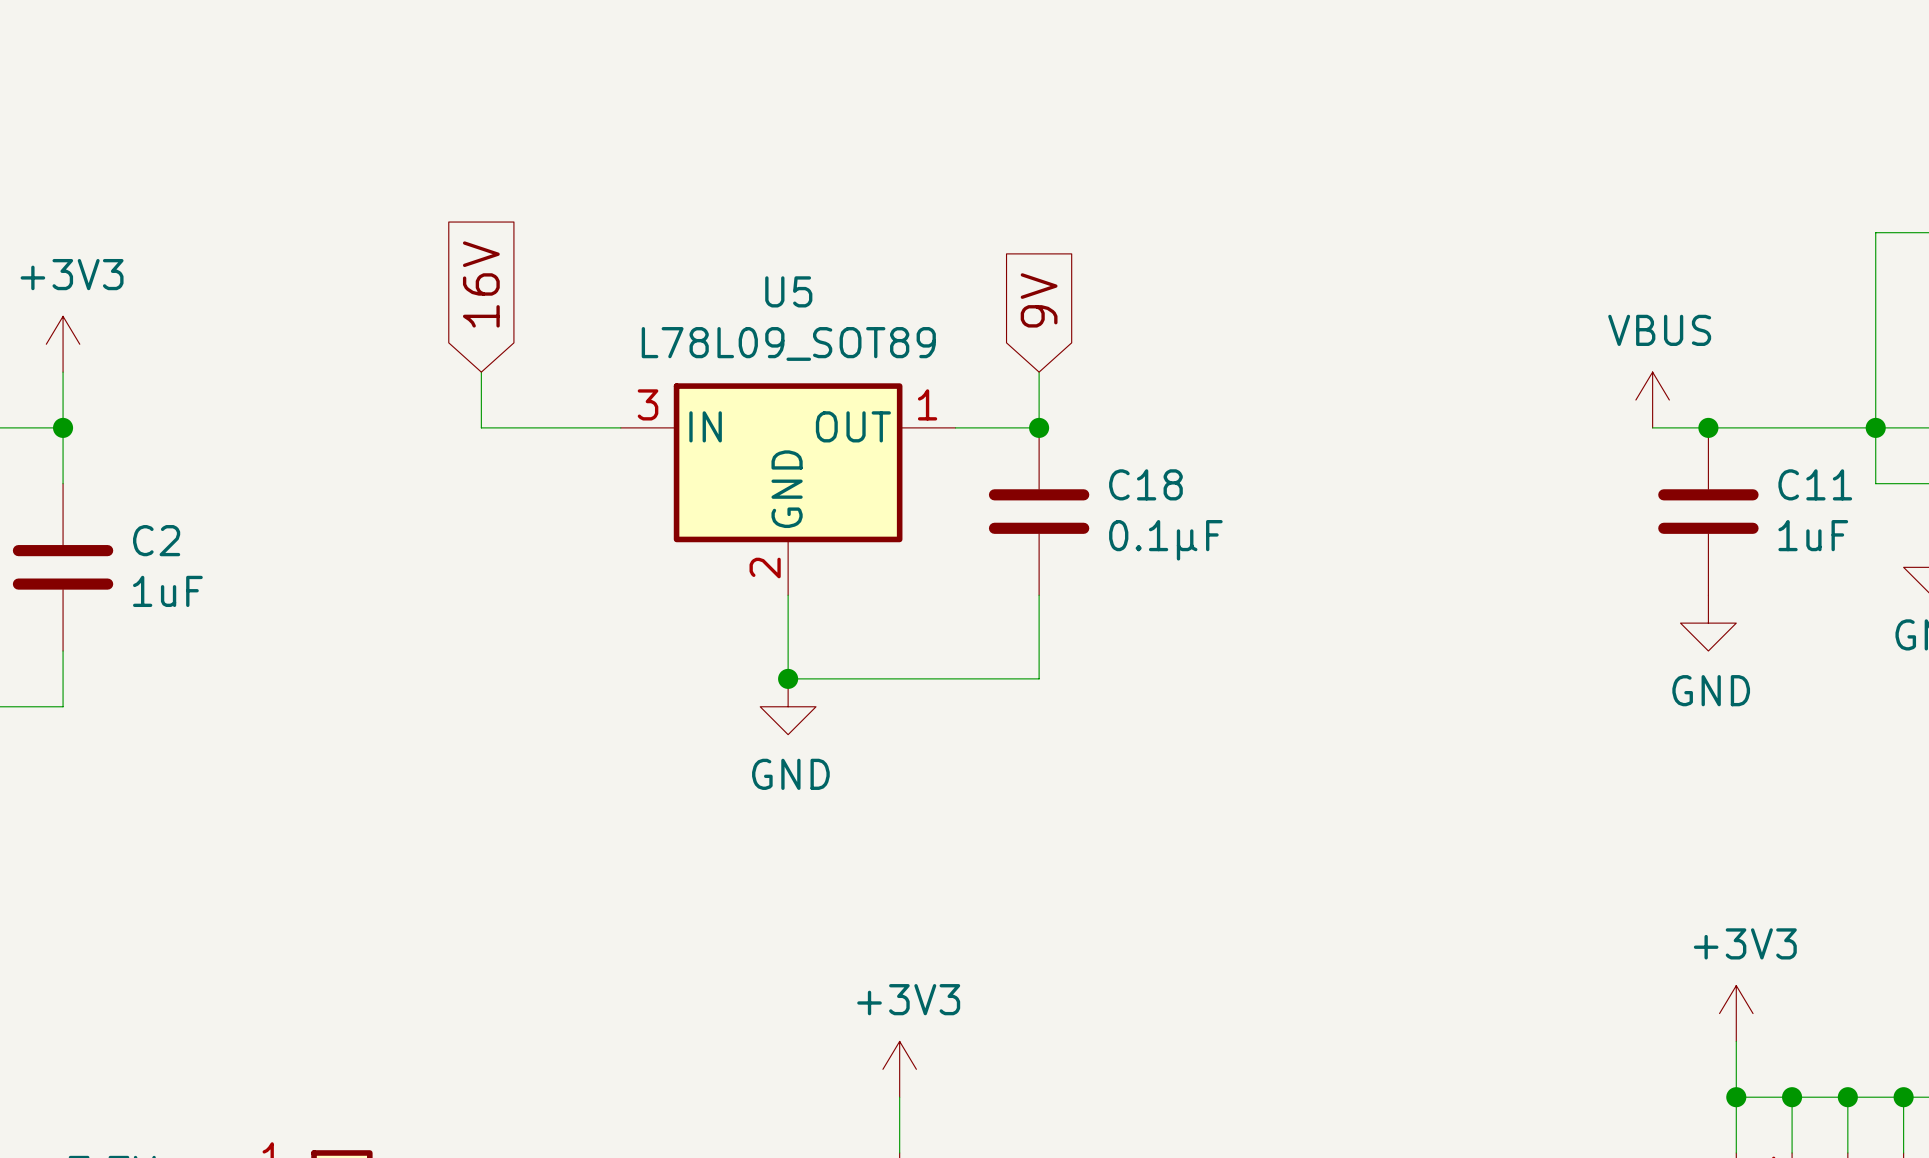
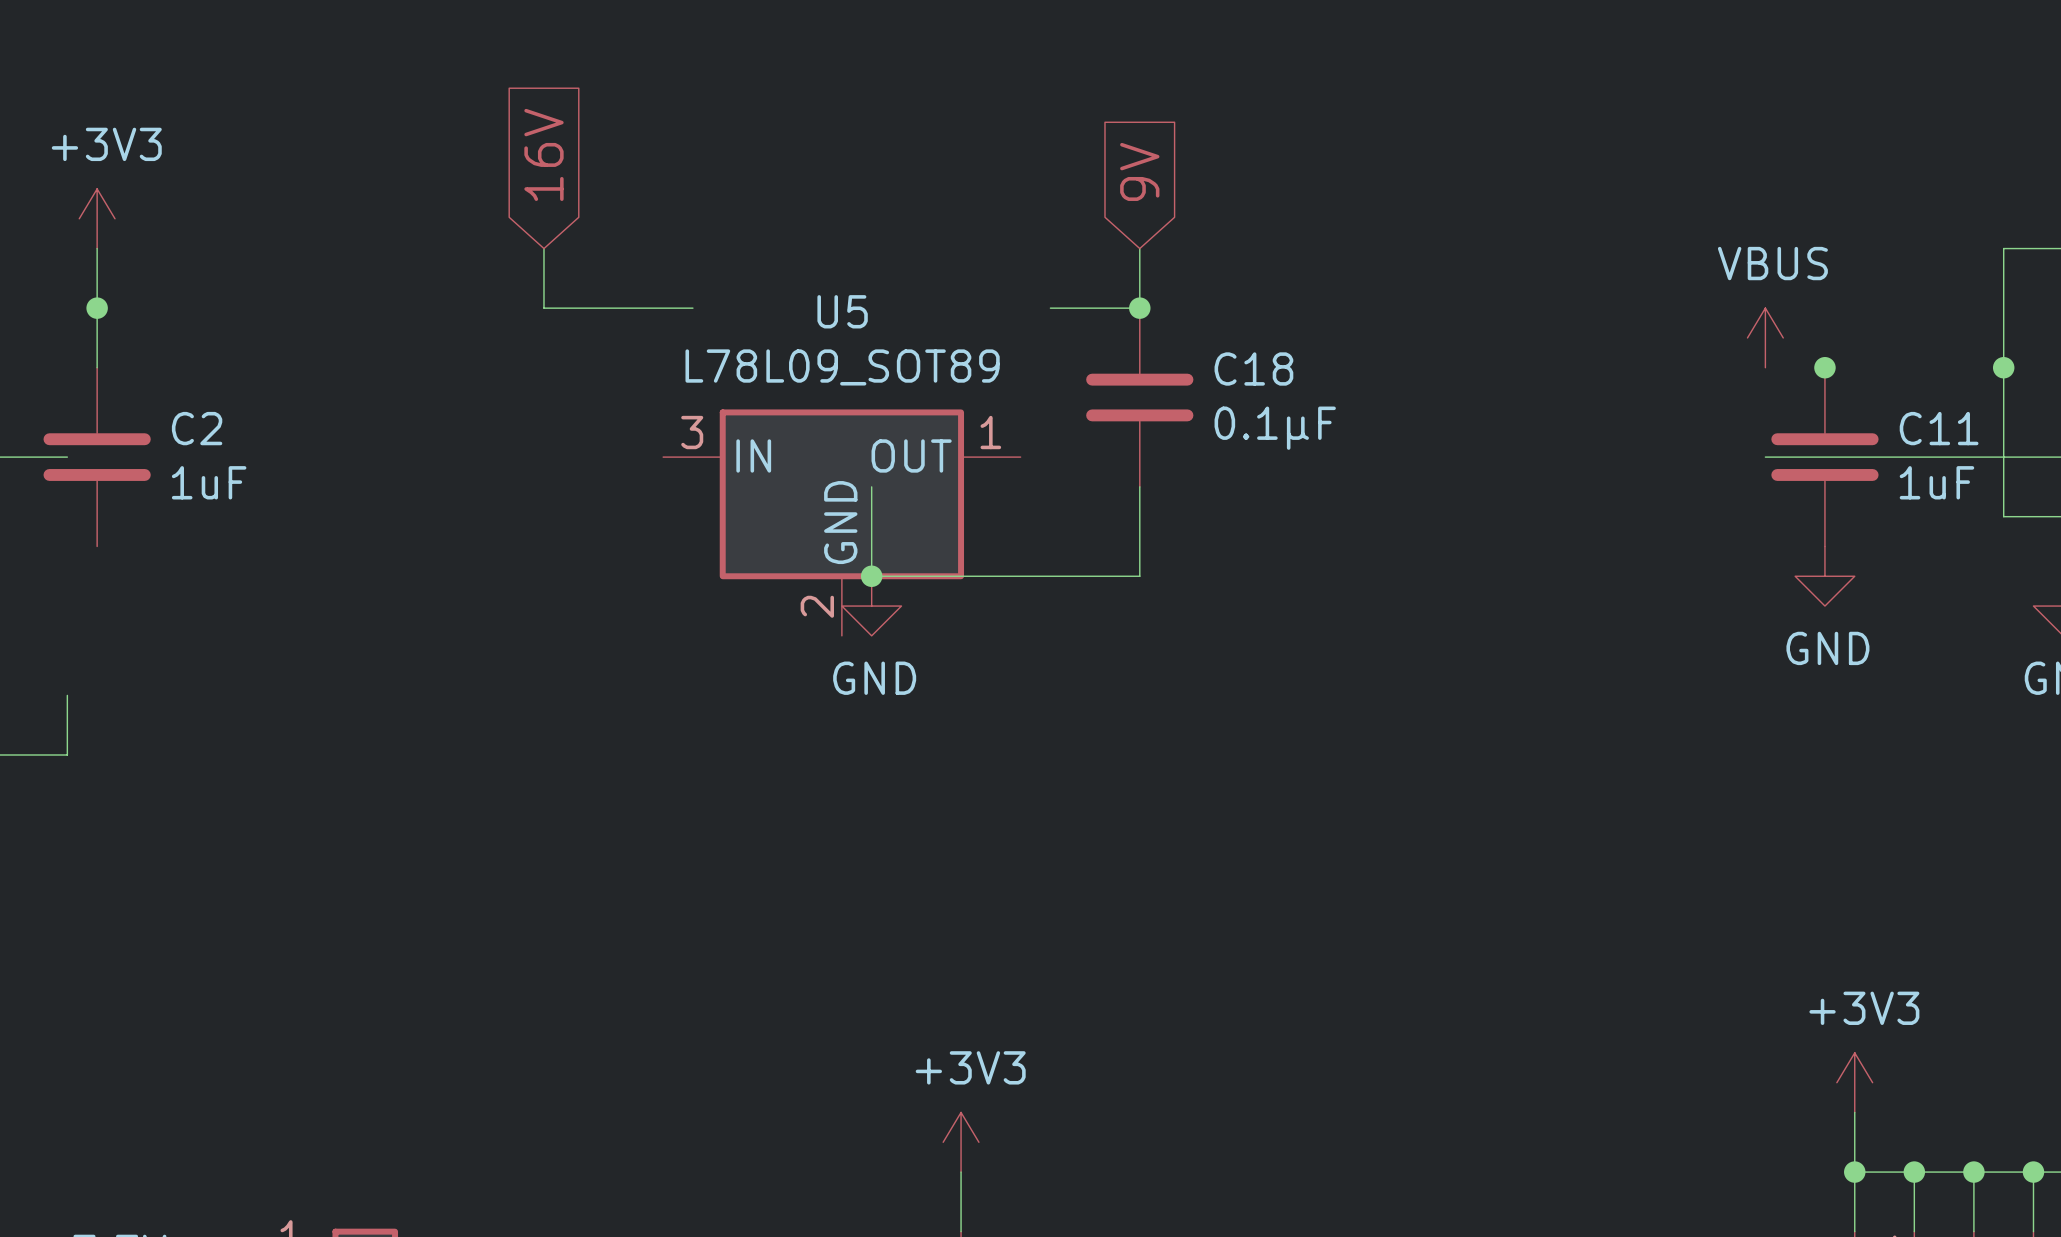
global label position: 16V (481, 284) -> 16V (543, 154)
junction: none -> (97, 308)
junction: none -> (1139, 308)
global label position: 9V (1039, 300) -> 9V (1139, 171)
power symbol position: +3V3 (63, 344) -> +3V3 (97, 218)
wire: (63, 372) (63, 483) -> (97, 248) (97, 367)
wire: (481, 372) (481, 427) (620, 427) -> (543, 248) (543, 308) (692, 308)
wire: (1039, 372) (1039, 427) (955, 427) -> (1139, 248) (1139, 308) (1050, 308)
power symbol position: VBUS (1652, 400) -> VBUS (1765, 337)
junction: (63, 427) -> none
junction: (1039, 427) -> none
junction position: (1708, 427) -> (1824, 367)
junction position: (1875, 427) -> (2003, 367)
C18 position: (1039, 511) -> (1139, 397)
C11 position: (1708, 511) -> (1824, 457)
junction: none -> (871, 576)
C2 position: (63, 567) -> (97, 457)
wire: (788, 595) (788, 678) (1039, 678) (1039, 595) -> (871, 486) (871, 576) (1139, 576) (1139, 486)
power symbol position: GND (1708, 623) -> GND (1824, 576)
junction: (788, 678) -> none
power symbol position: GND (788, 706) -> GND (871, 606)

